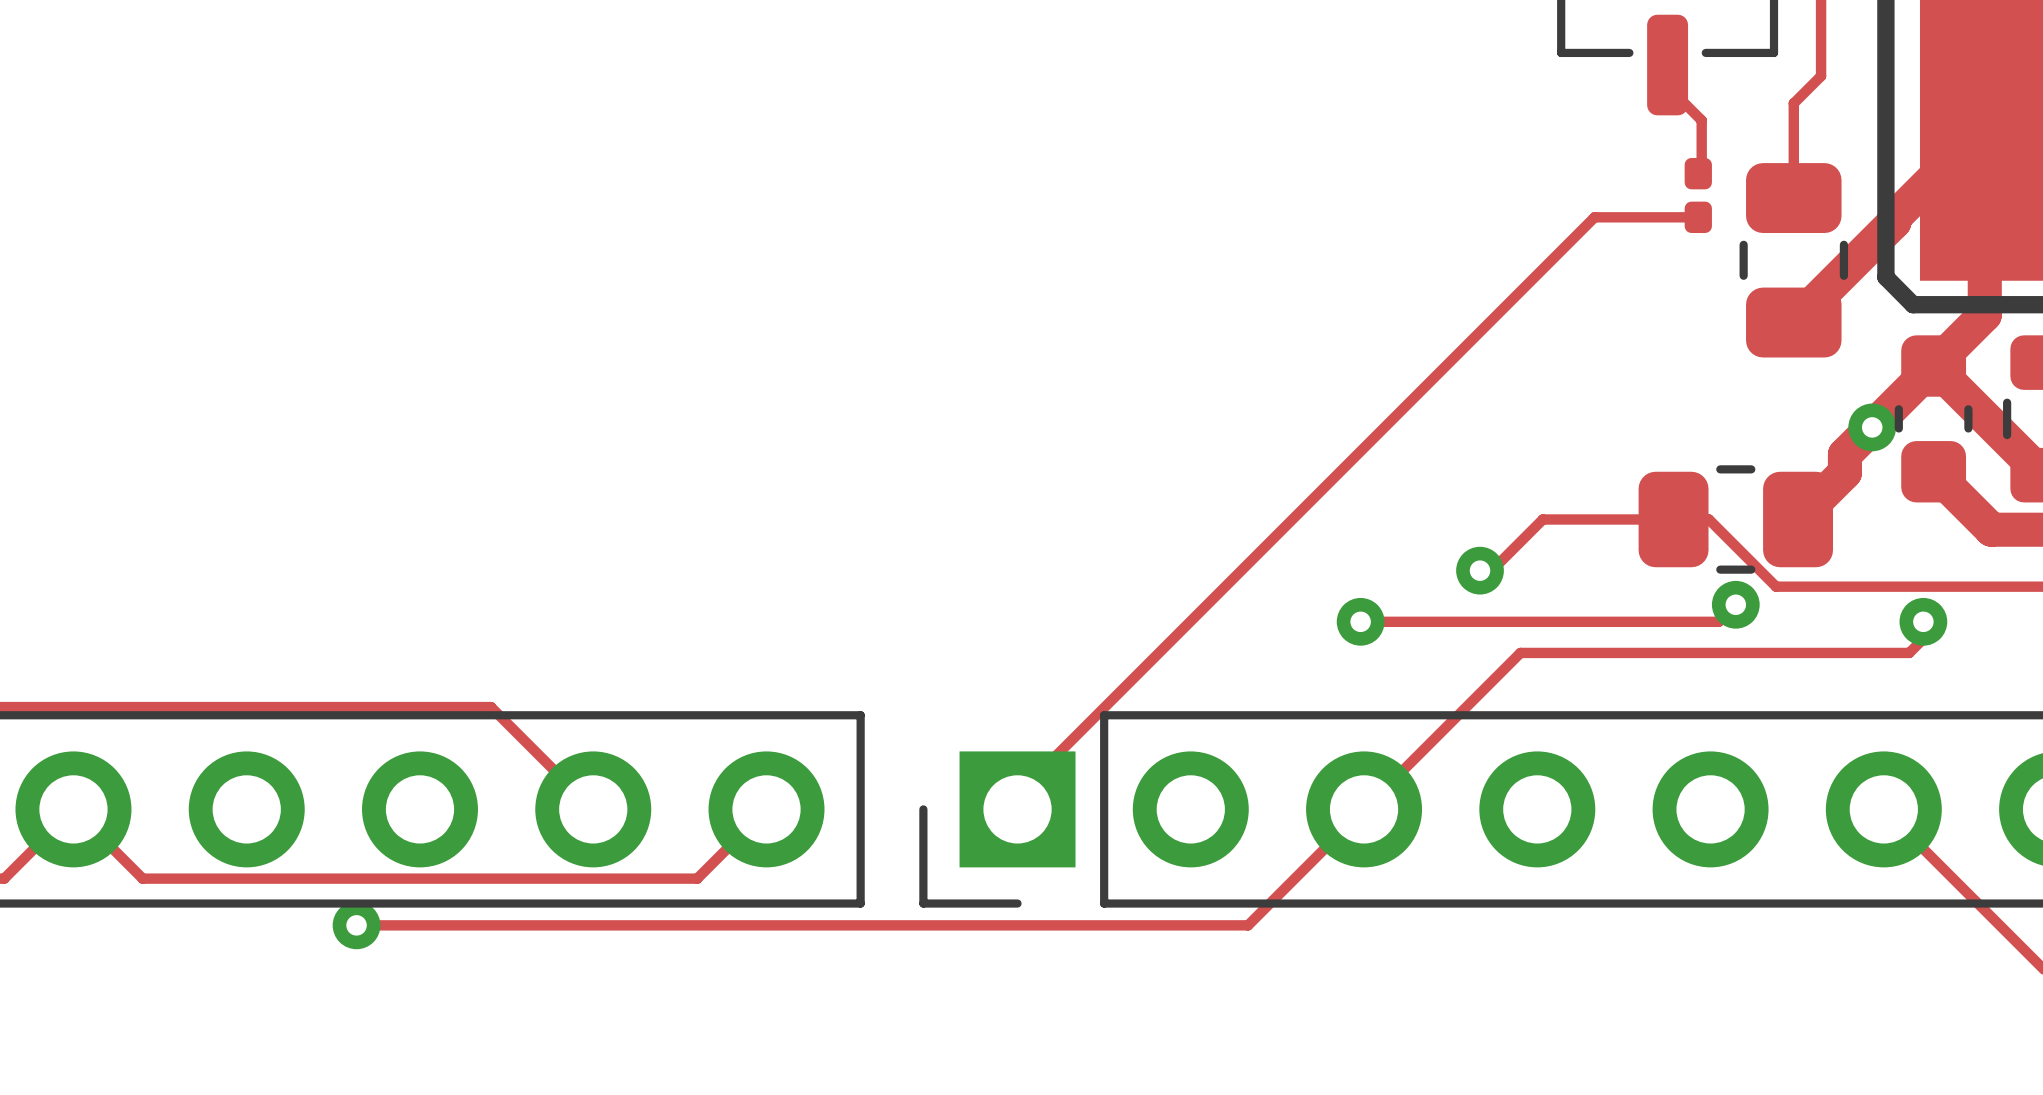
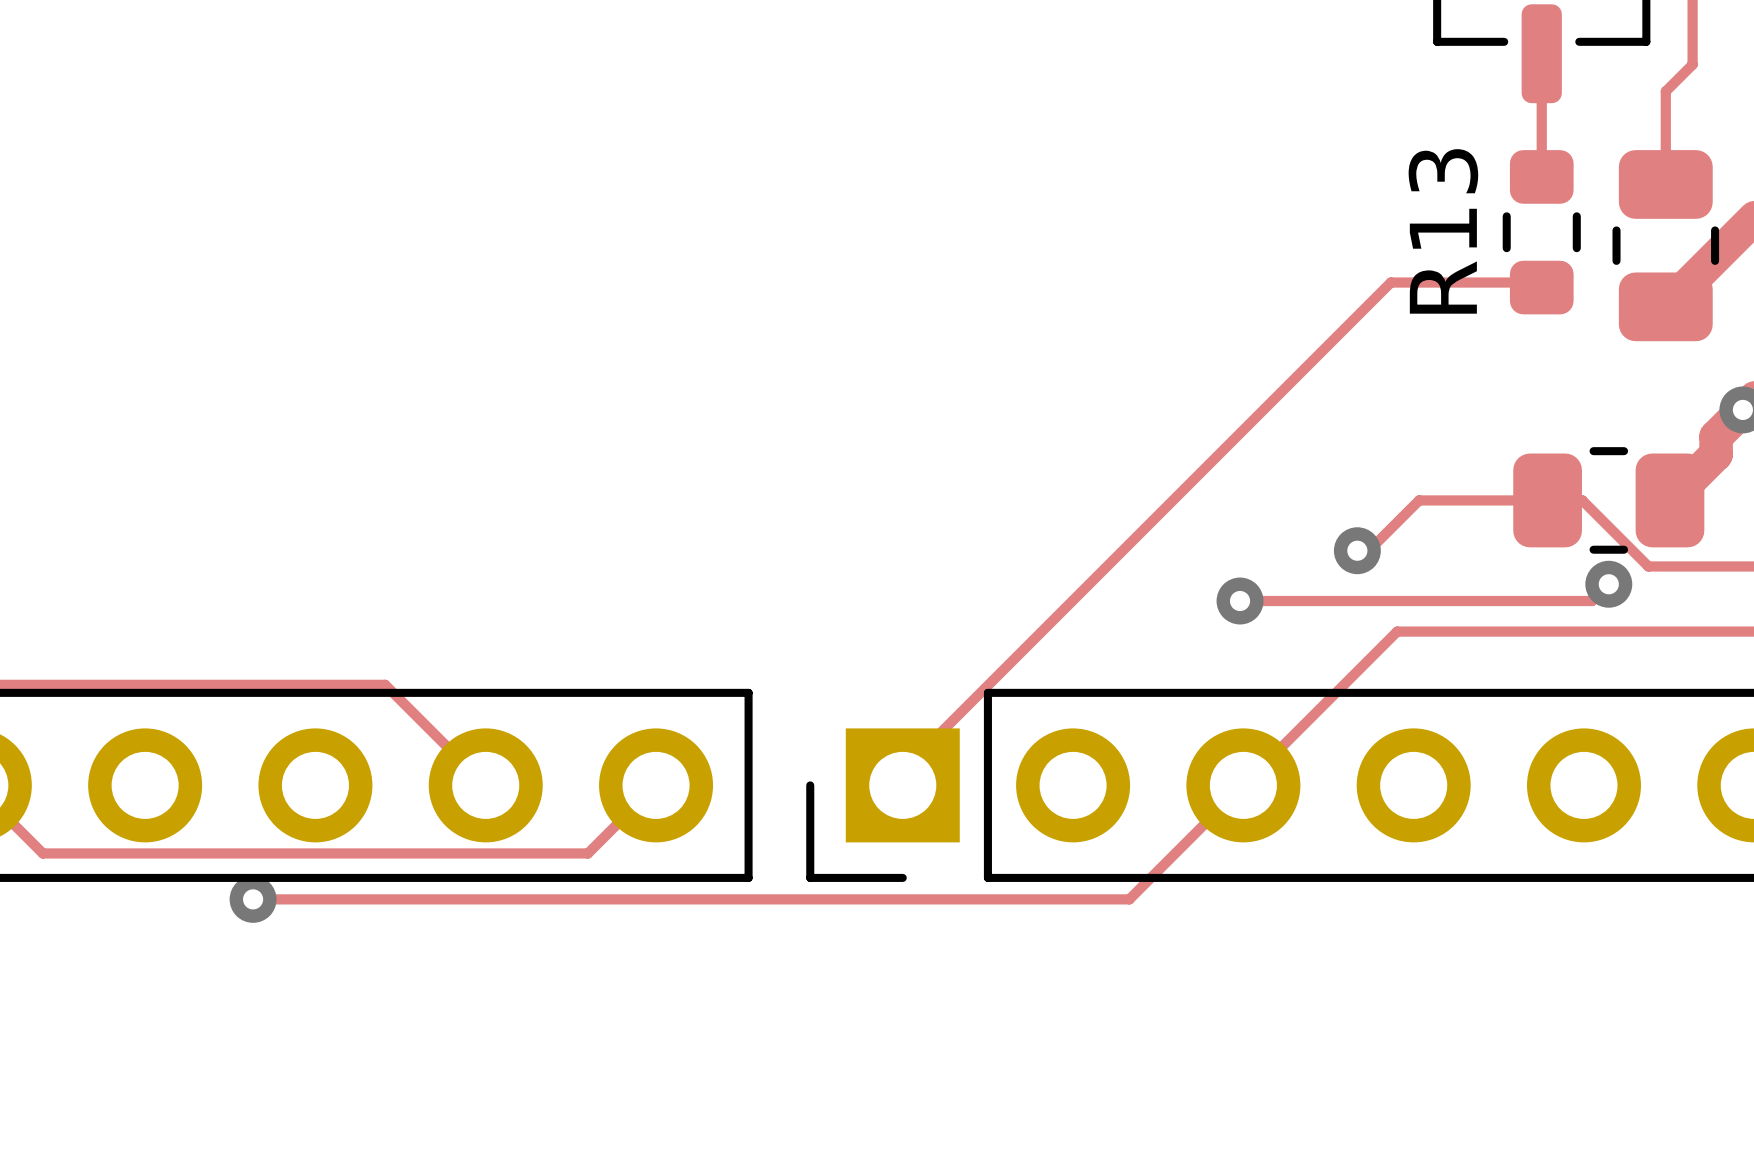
track: (1667, 86) (1701, 120) (1701, 170) (1698, 173) -> (1541, 74) (1541, 176)
part: (1698, 195) -> none
track: (1698, 217) (1594, 217) (1514, 297) -> (1541, 287) (1536, 282) (1390, 282)
R13: none -> (1541, 232)

